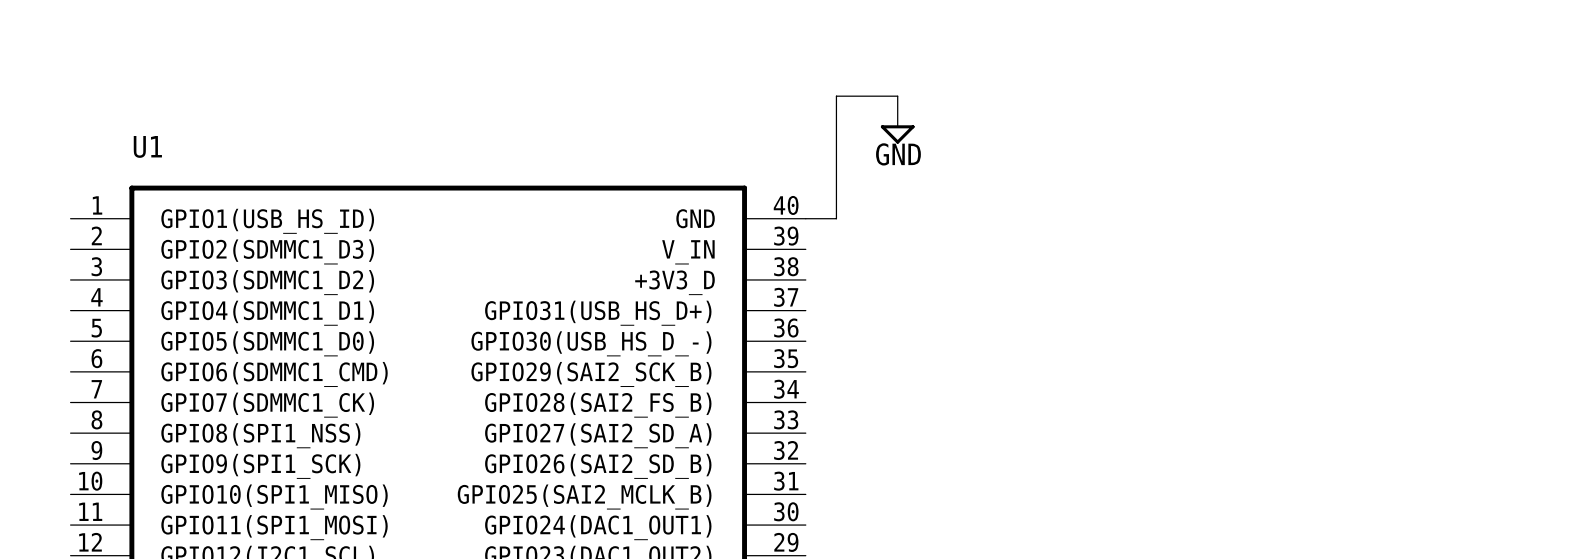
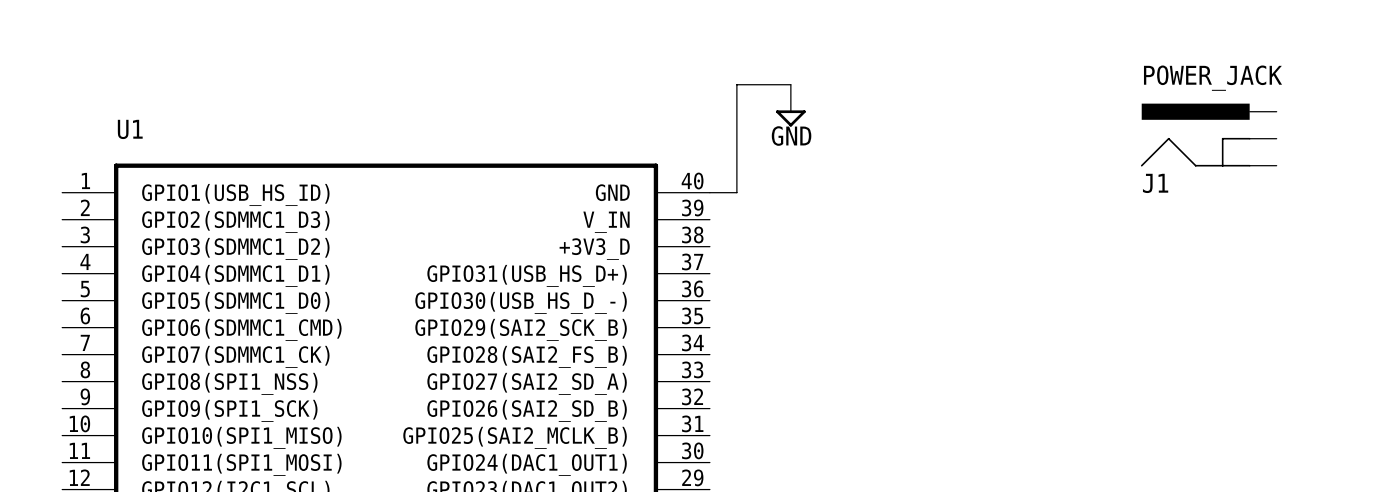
J1: none -> POWER_JACK (1208, 135)

